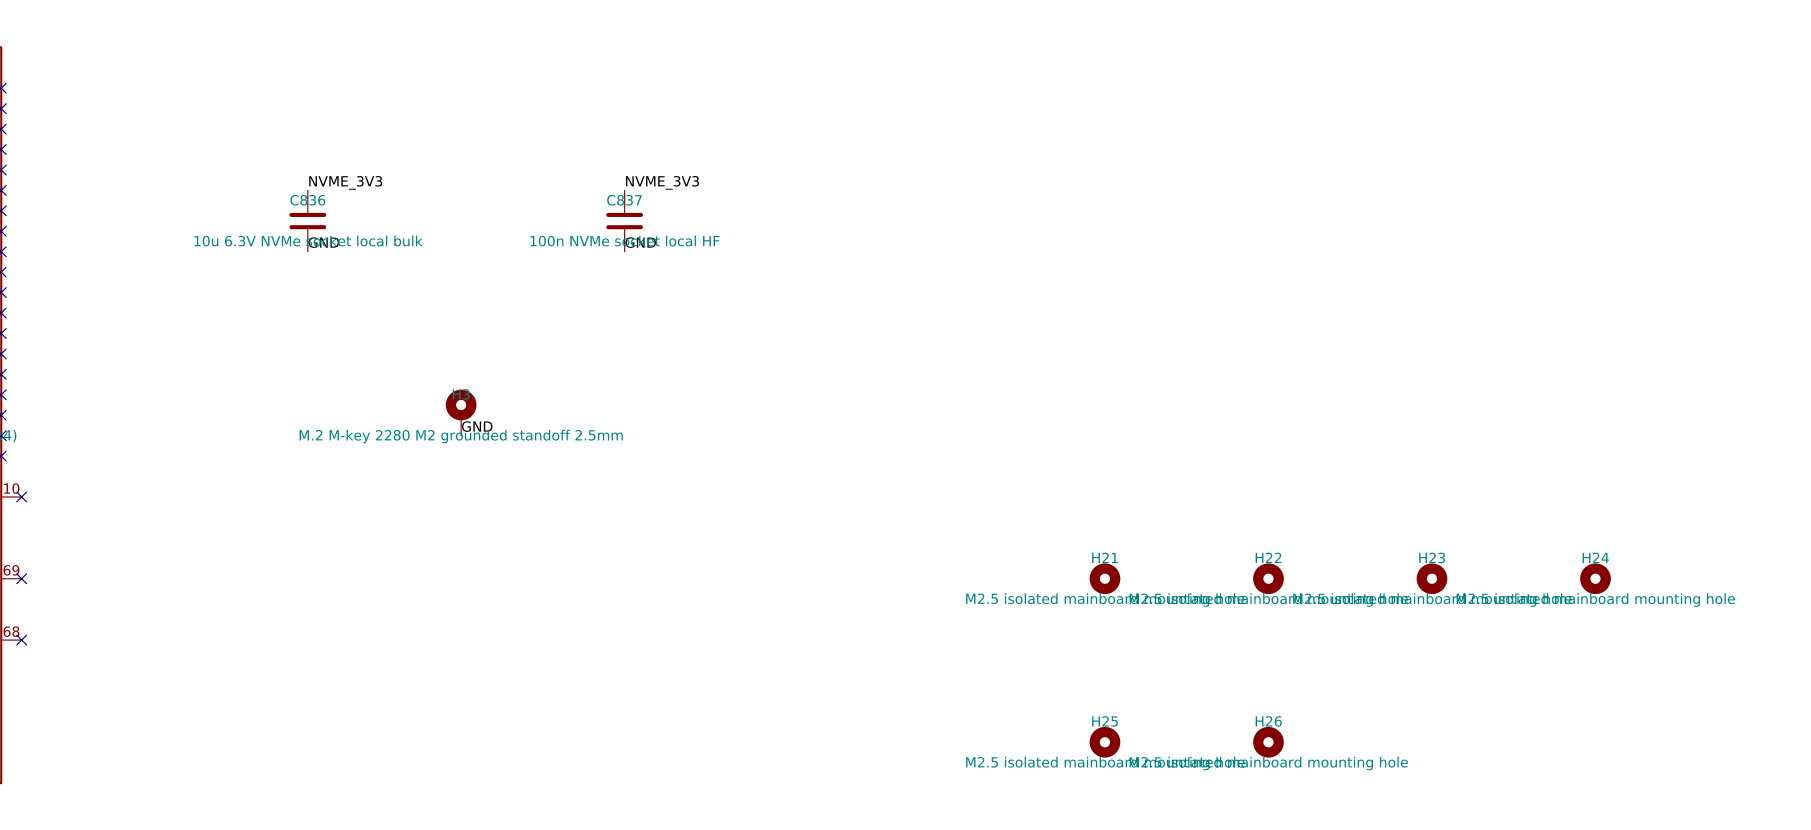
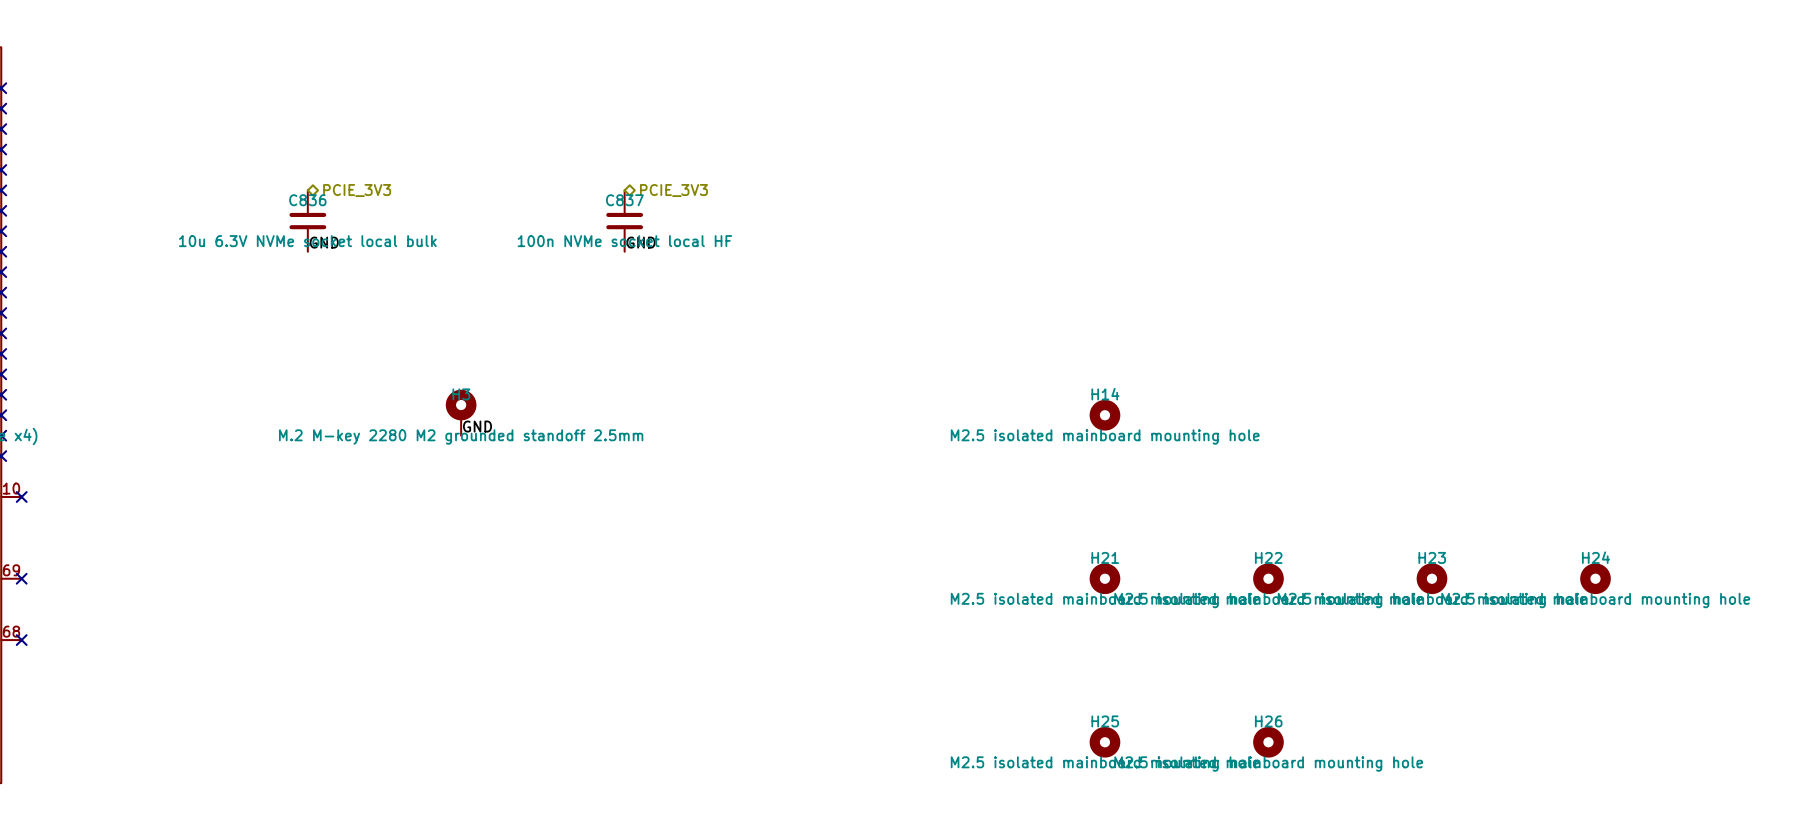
label: NVME_3V3 (345, 182) -> none
label: NVME_3V3 (662, 182) -> none
hierarchical label: none -> PCIE_3V3 (357, 190)
hierarchical label: none -> PCIE_3V3 (673, 190)
H14: none -> M2.5 isolated mainboard mounting hole (1104, 415)

